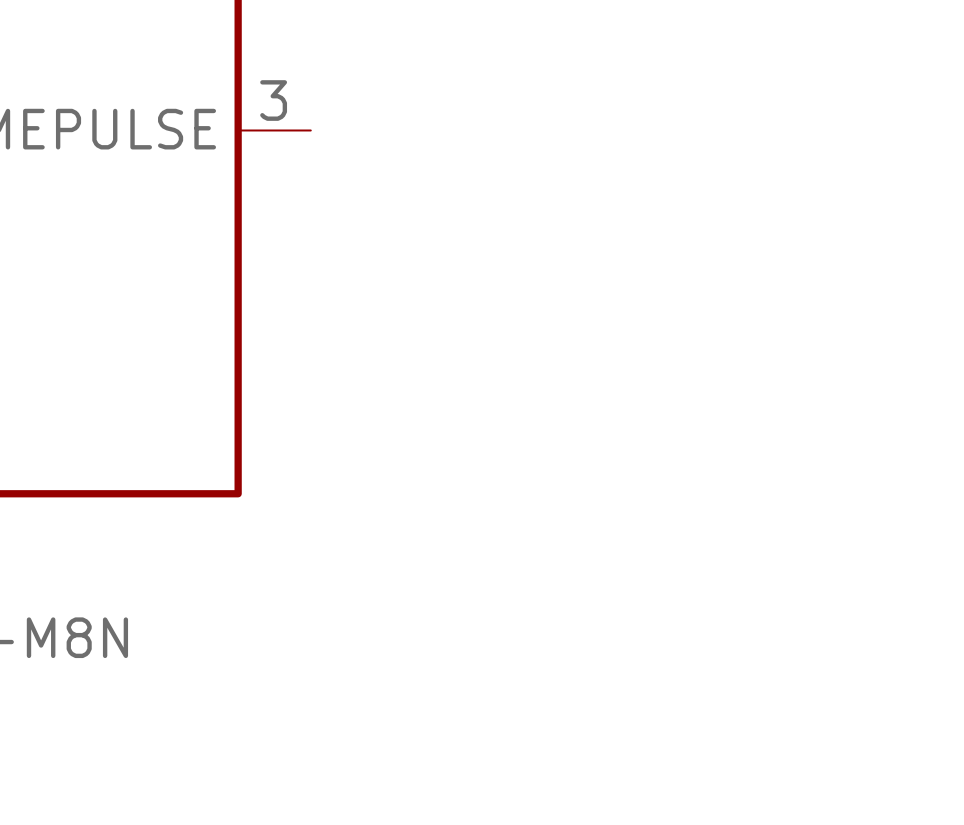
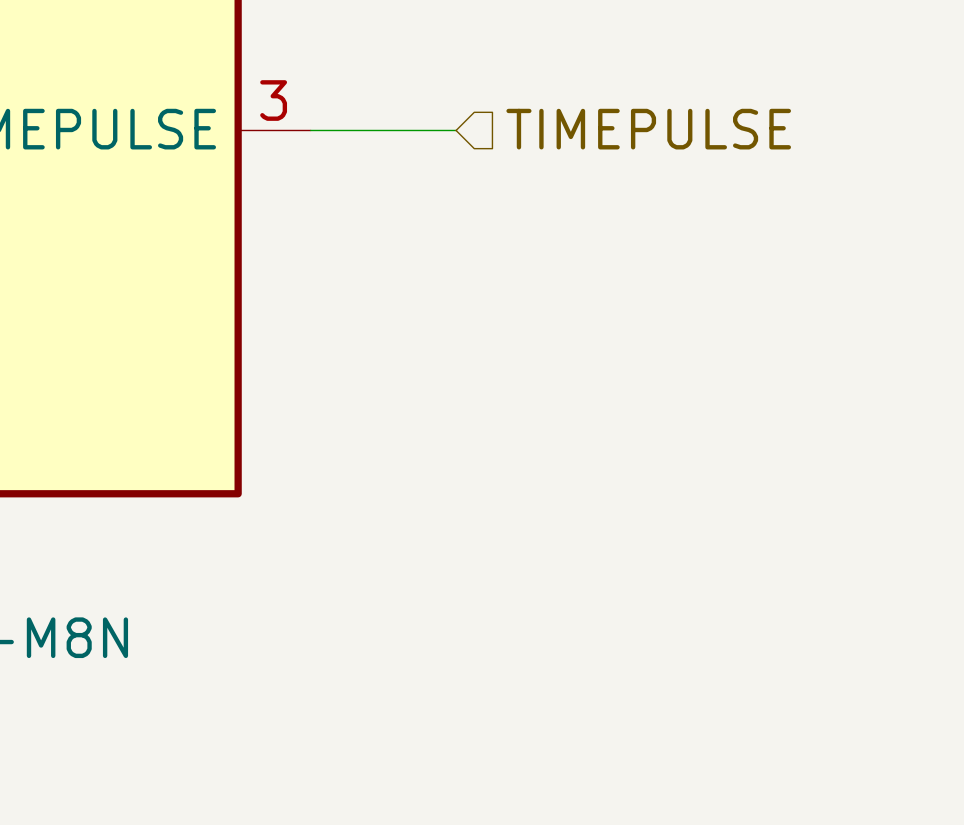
hierarchical label: none -> TIMEPULSE (648, 129)
wire: none -> (310, 130) (456, 130)

